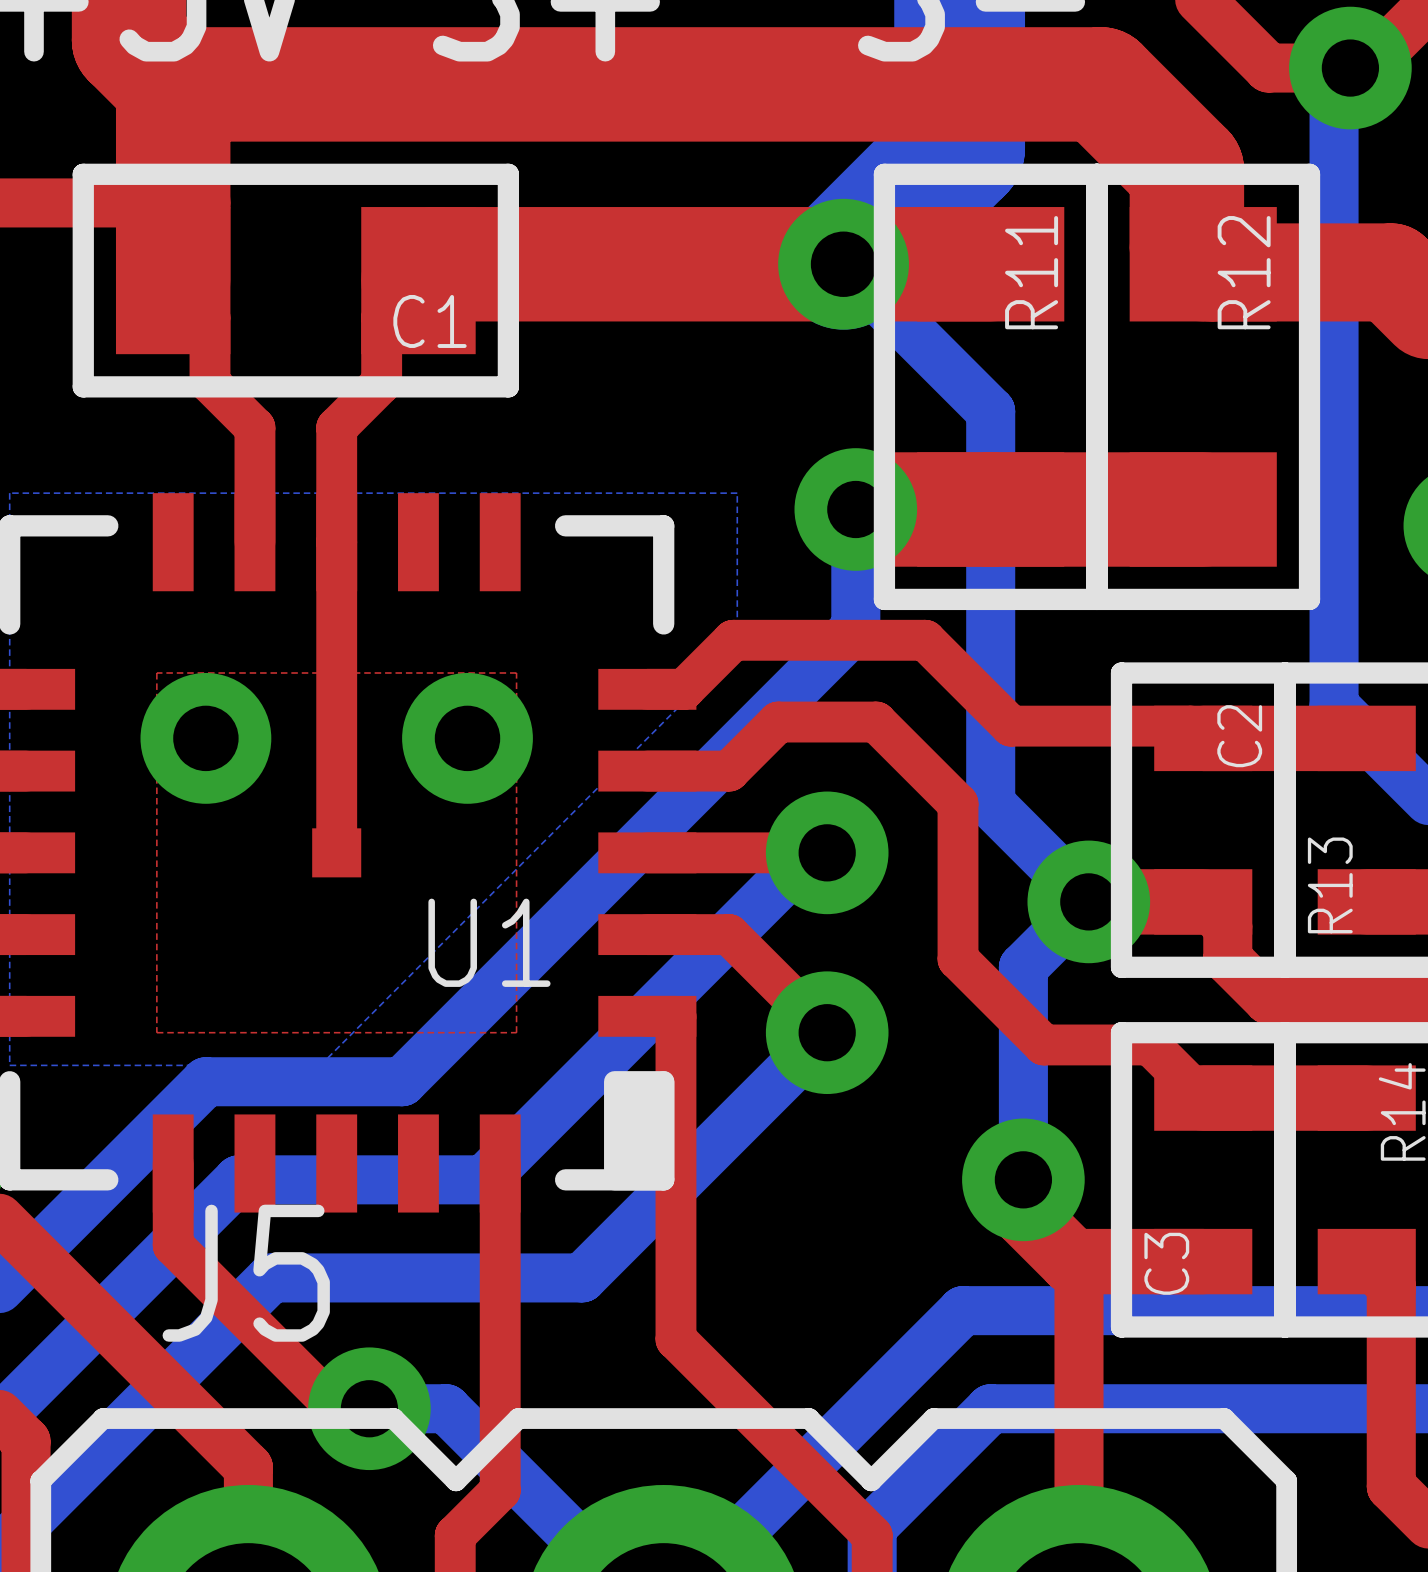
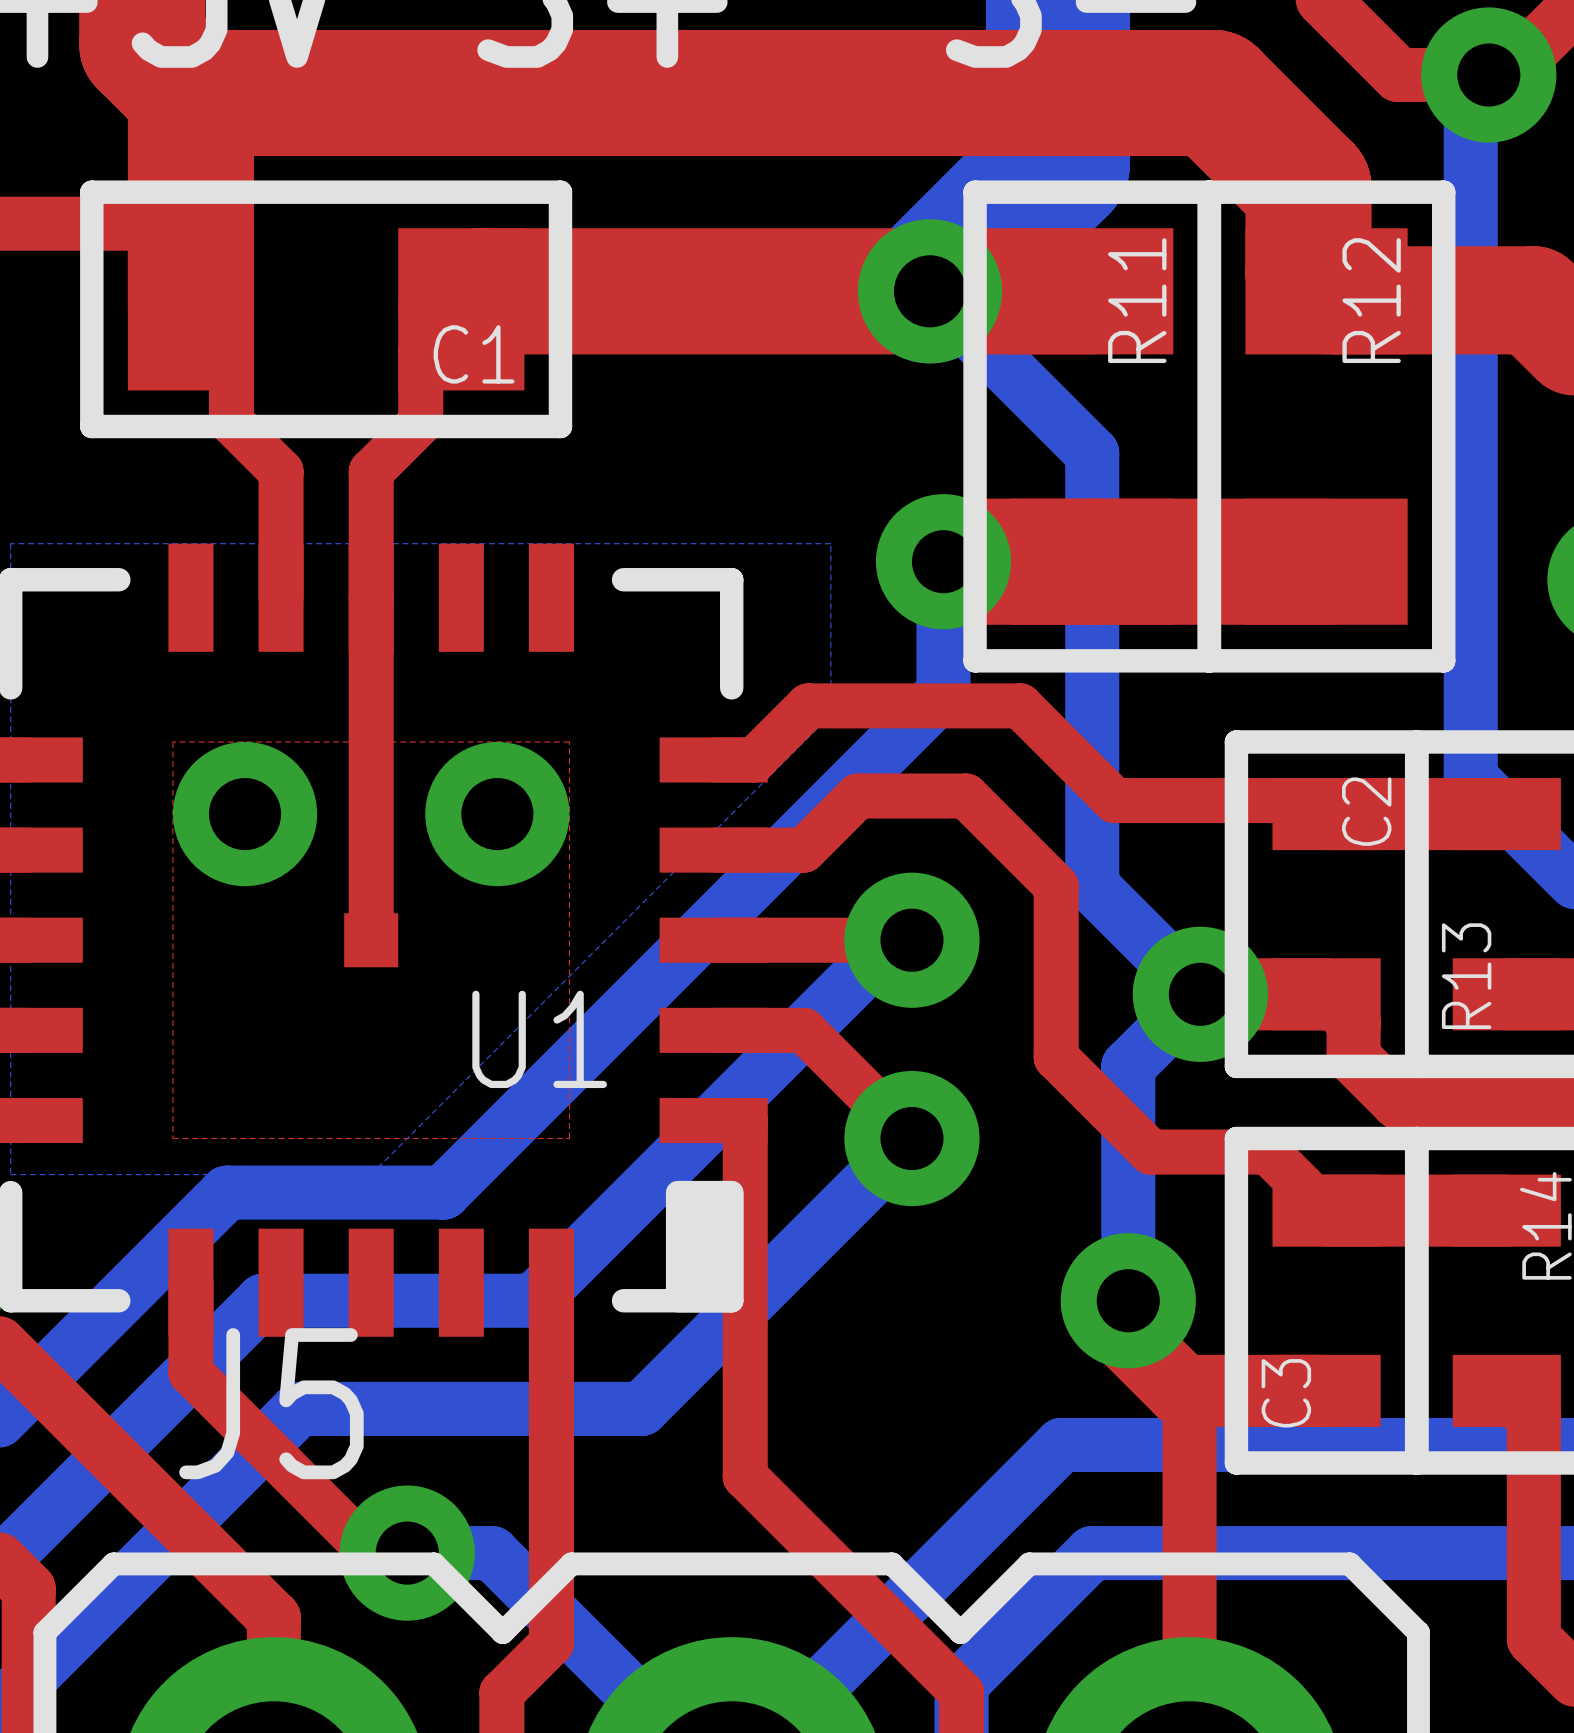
bottom zone outline: (737, 493) (737, 648) (320, 1065) -> (812, 543) (830, 543) (830, 714) (371, 1174) (353, 1174)
via position: (205, 738) -> (245, 814)
via position: (467, 738) -> (497, 814)

